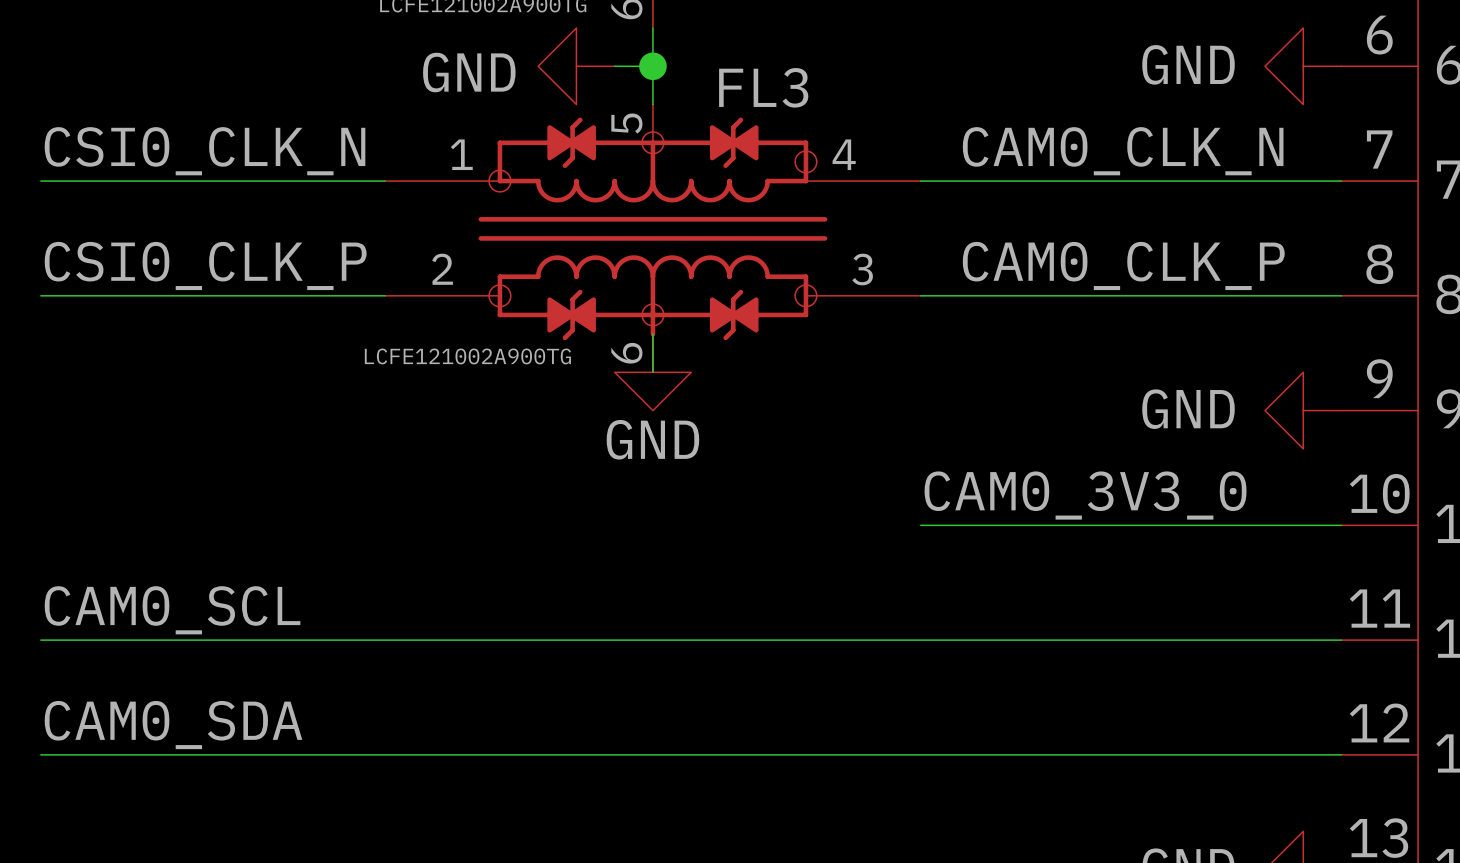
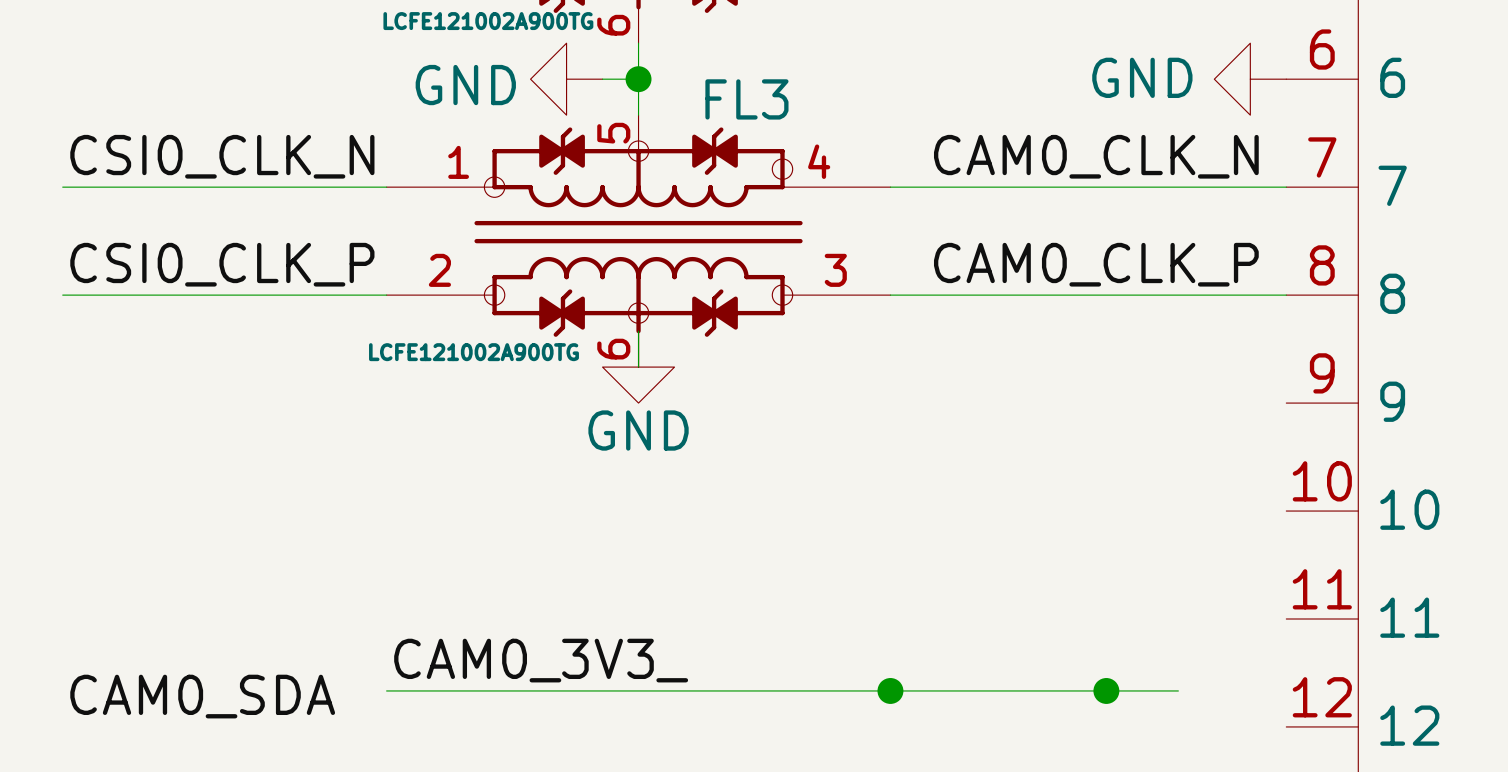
power symbol: GND (1303, 410) -> none
label: CAM0_3V3_0 (1085, 495) -> none
wire: (920, 525) (1341, 525) -> none
label: CAM0_SCL (172, 610) -> none
wire: (40, 640) (1341, 640) -> none
label: none -> CAM0_3V3_ (541, 660)
wire: none -> (386, 690) (1178, 690)
junction: none -> (890, 690)
junction: none -> (1106, 690)
wire: (40, 754) (1341, 754) -> none

